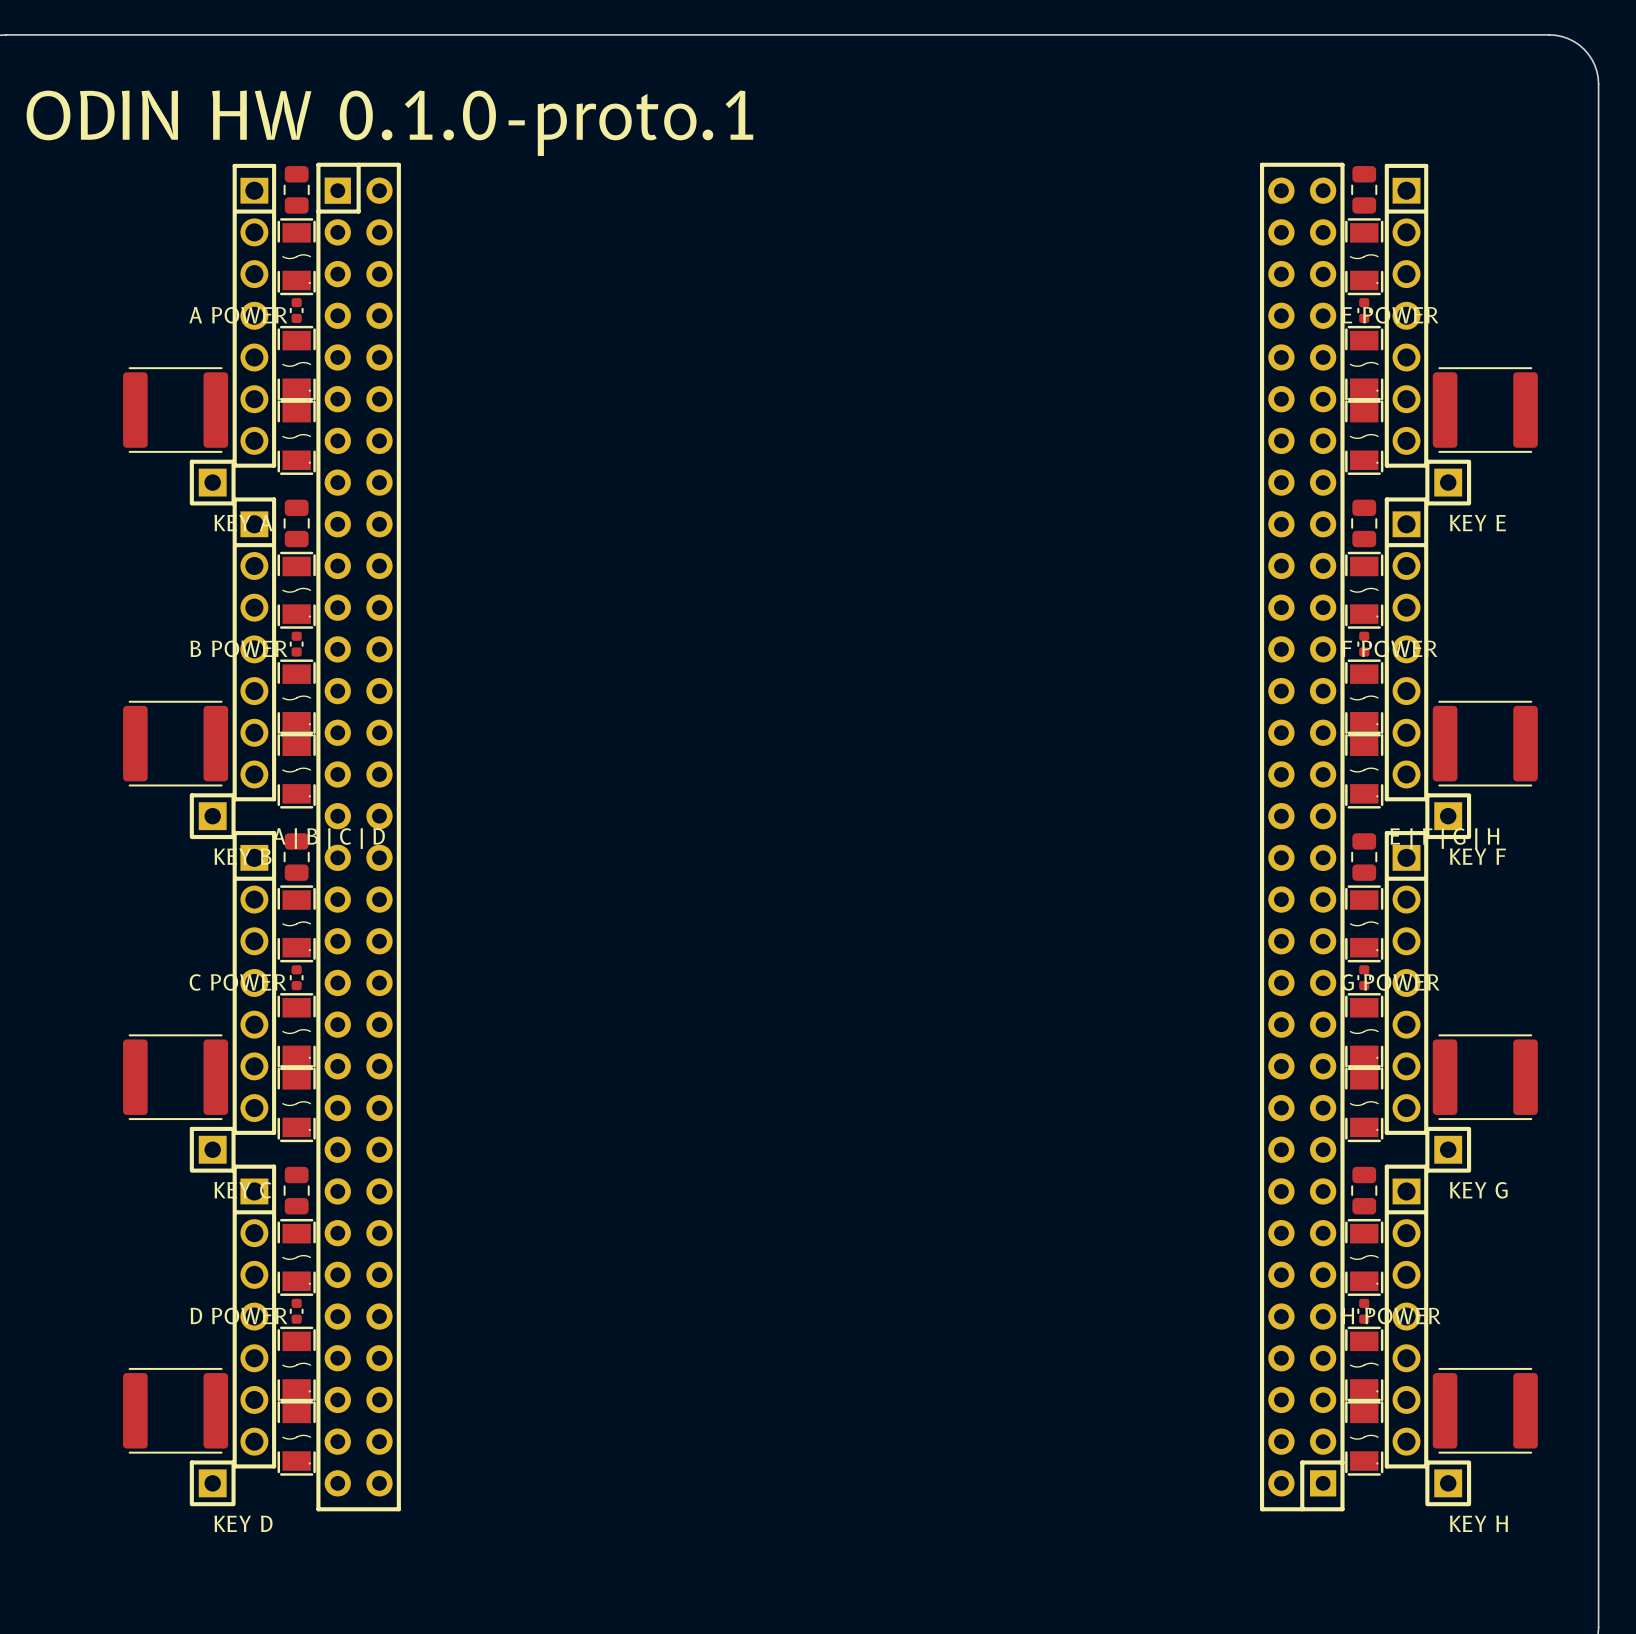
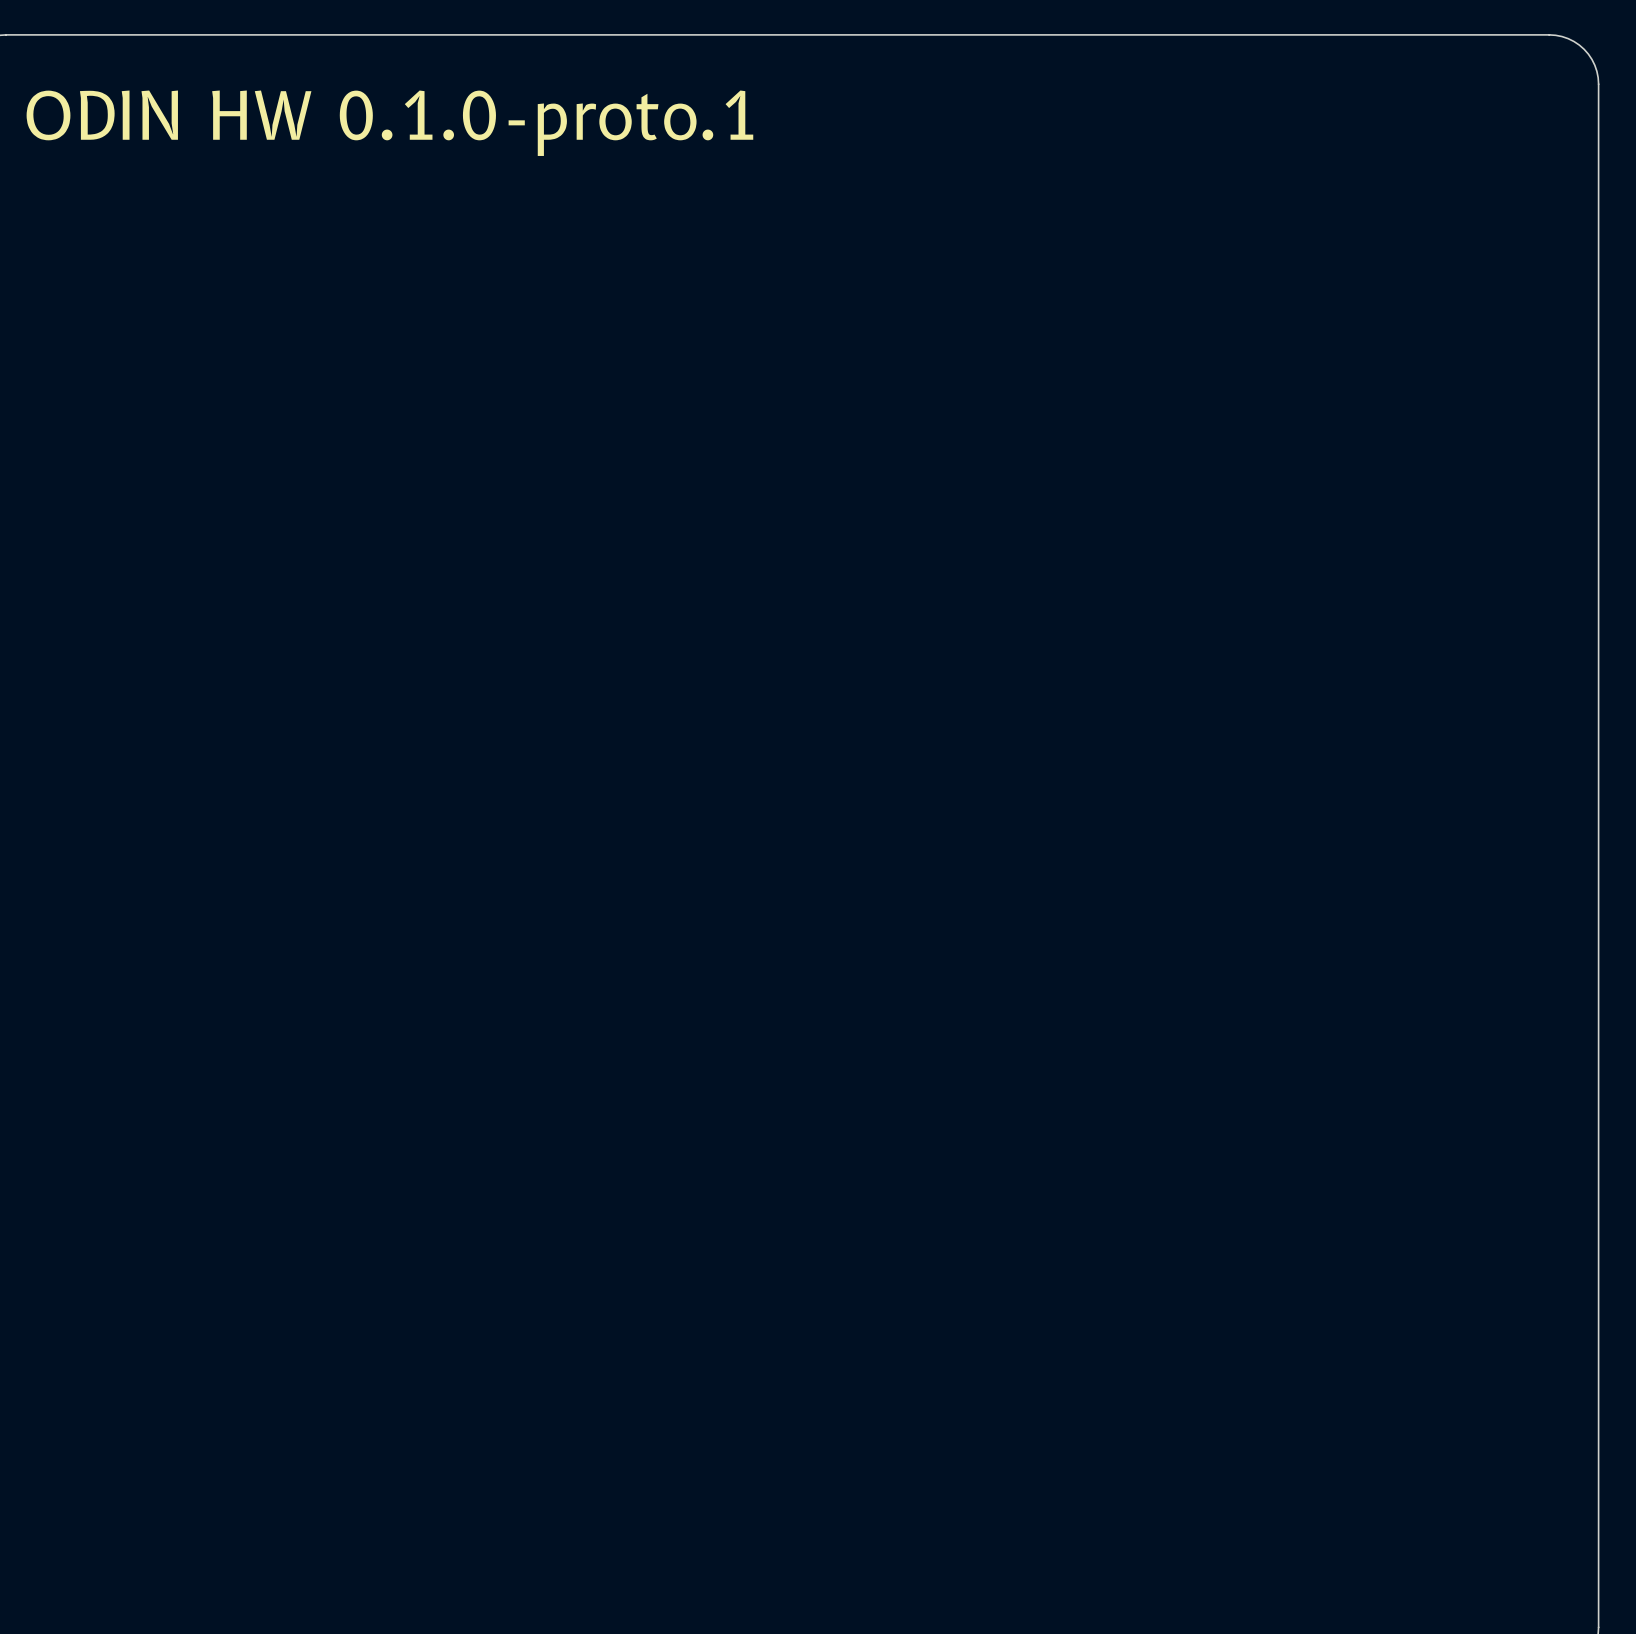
part: (296, 189) -> none
part: (1364, 189) -> none
part: (296, 256) -> none
part: (1364, 256) -> none
part: (296, 310) -> none
part: (1364, 310) -> none
part: (254, 315) -> none
part: (1406, 315) -> none
part: (296, 364) -> none
part: (1364, 364) -> none
part: (175, 410) -> none
part: (1485, 410) -> none
part: (296, 436) -> none
part: (1364, 436) -> none
part: (212, 482) -> none
part: (1448, 482) -> none
part: (296, 523) -> none
part: (1364, 523) -> none
part: (296, 590) -> none
part: (1364, 590) -> none
part: (296, 644) -> none
part: (1364, 644) -> none
part: (254, 649) -> none
part: (1406, 649) -> none
part: (296, 697) -> none
part: (1364, 697) -> none
part: (175, 743) -> none
part: (1485, 743) -> none
part: (296, 770) -> none
part: (1364, 770) -> none
part: (212, 816) -> none
part: (1448, 816) -> none
part: (358, 837) -> none
part: (1302, 837) -> none
part: (296, 857) -> none
part: (1364, 857) -> none
part: (296, 923) -> none
part: (1364, 923) -> none
part: (296, 977) -> none
part: (1364, 977) -> none
part: (254, 982) -> none
part: (1406, 982) -> none
part: (296, 1031) -> none
part: (1364, 1031) -> none
part: (175, 1077) -> none
part: (1485, 1077) -> none
part: (296, 1103) -> none
part: (1364, 1103) -> none
part: (212, 1149) -> none
part: (1448, 1149) -> none
part: (296, 1190) -> none
part: (1364, 1190) -> none
part: (296, 1257) -> none
part: (1364, 1257) -> none
part: (296, 1311) -> none
part: (1364, 1311) -> none
part: (254, 1316) -> none
part: (1406, 1316) -> none
part: (296, 1365) -> none
part: (1364, 1365) -> none
part: (175, 1410) -> none
part: (1485, 1410) -> none
part: (296, 1437) -> none
part: (1364, 1437) -> none
part: (212, 1483) -> none
part: (1448, 1483) -> none

